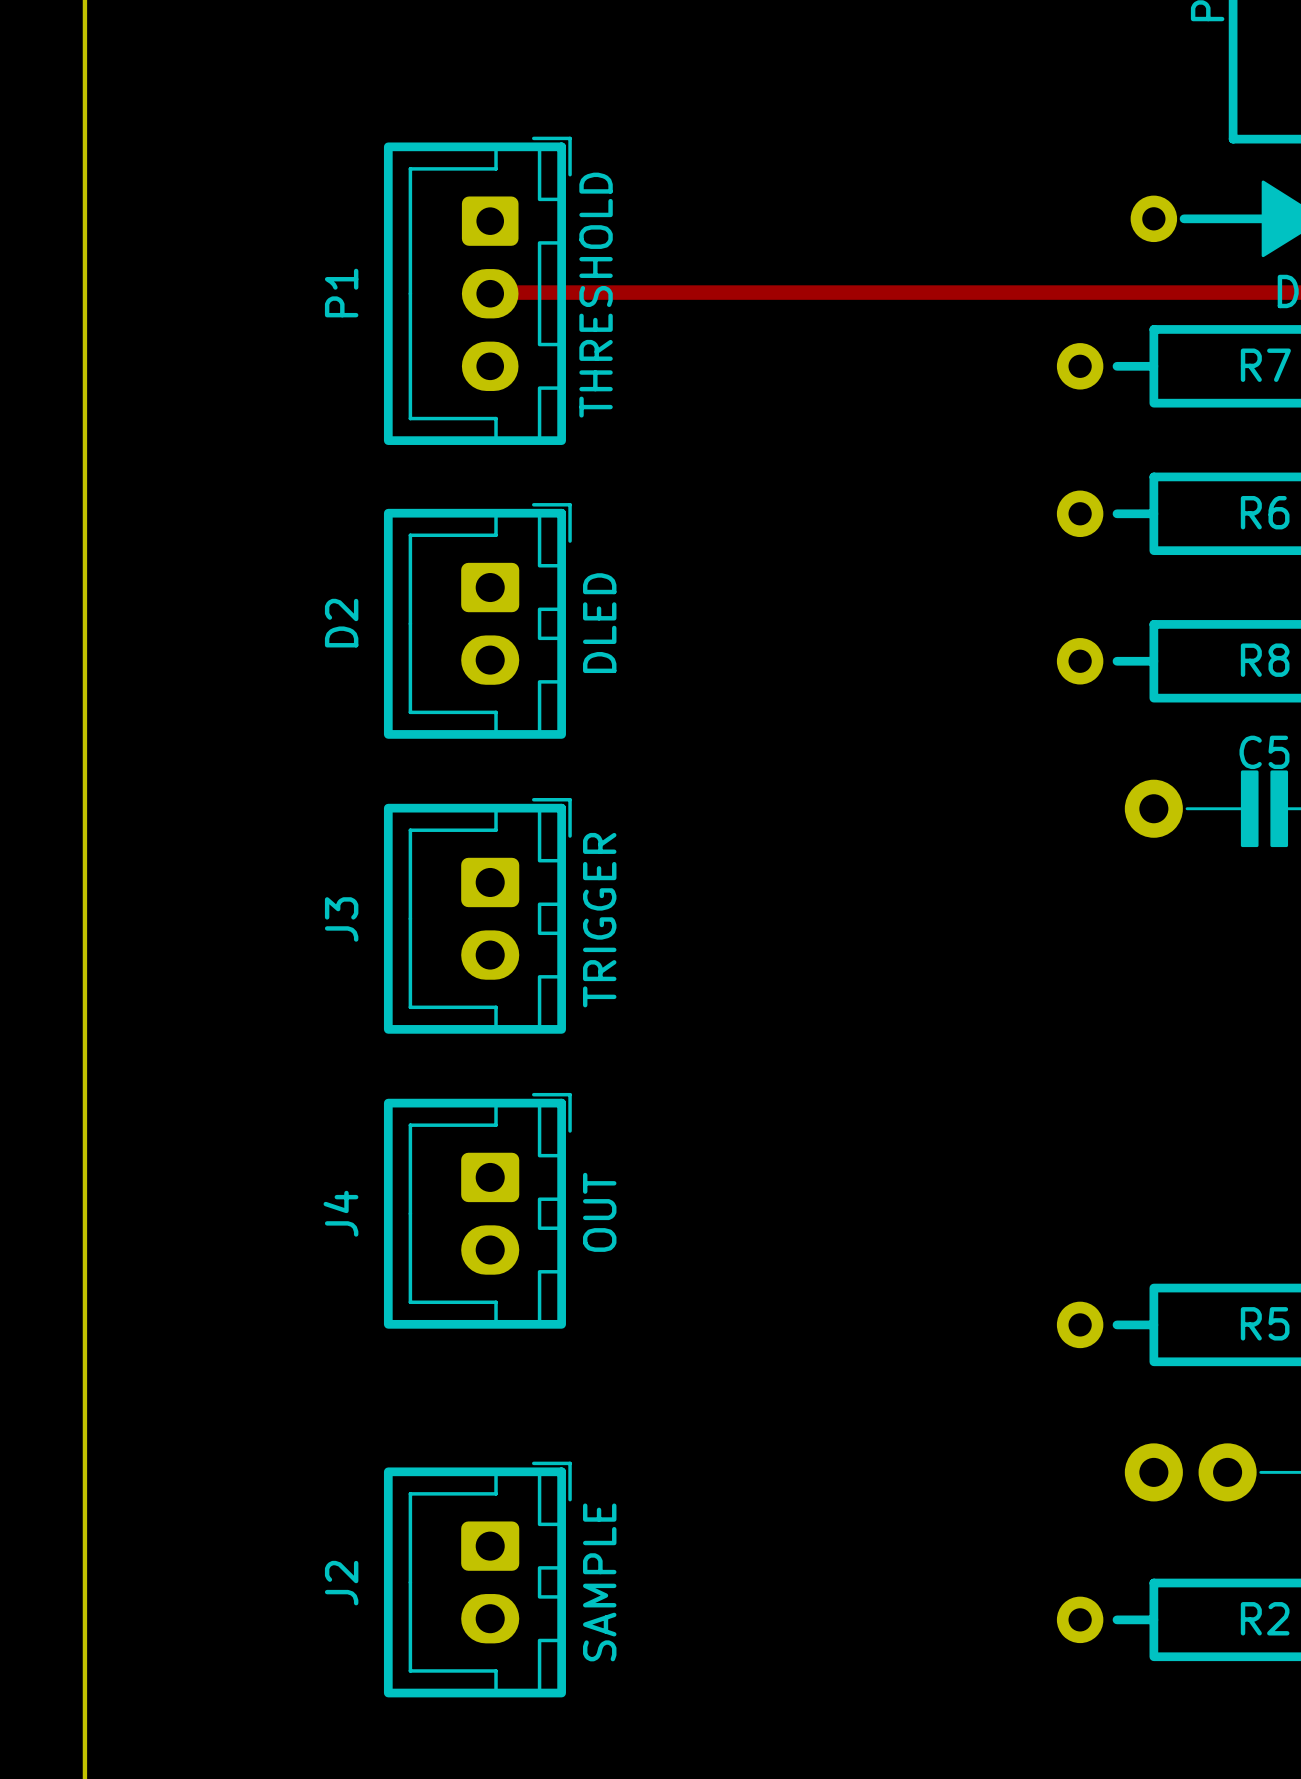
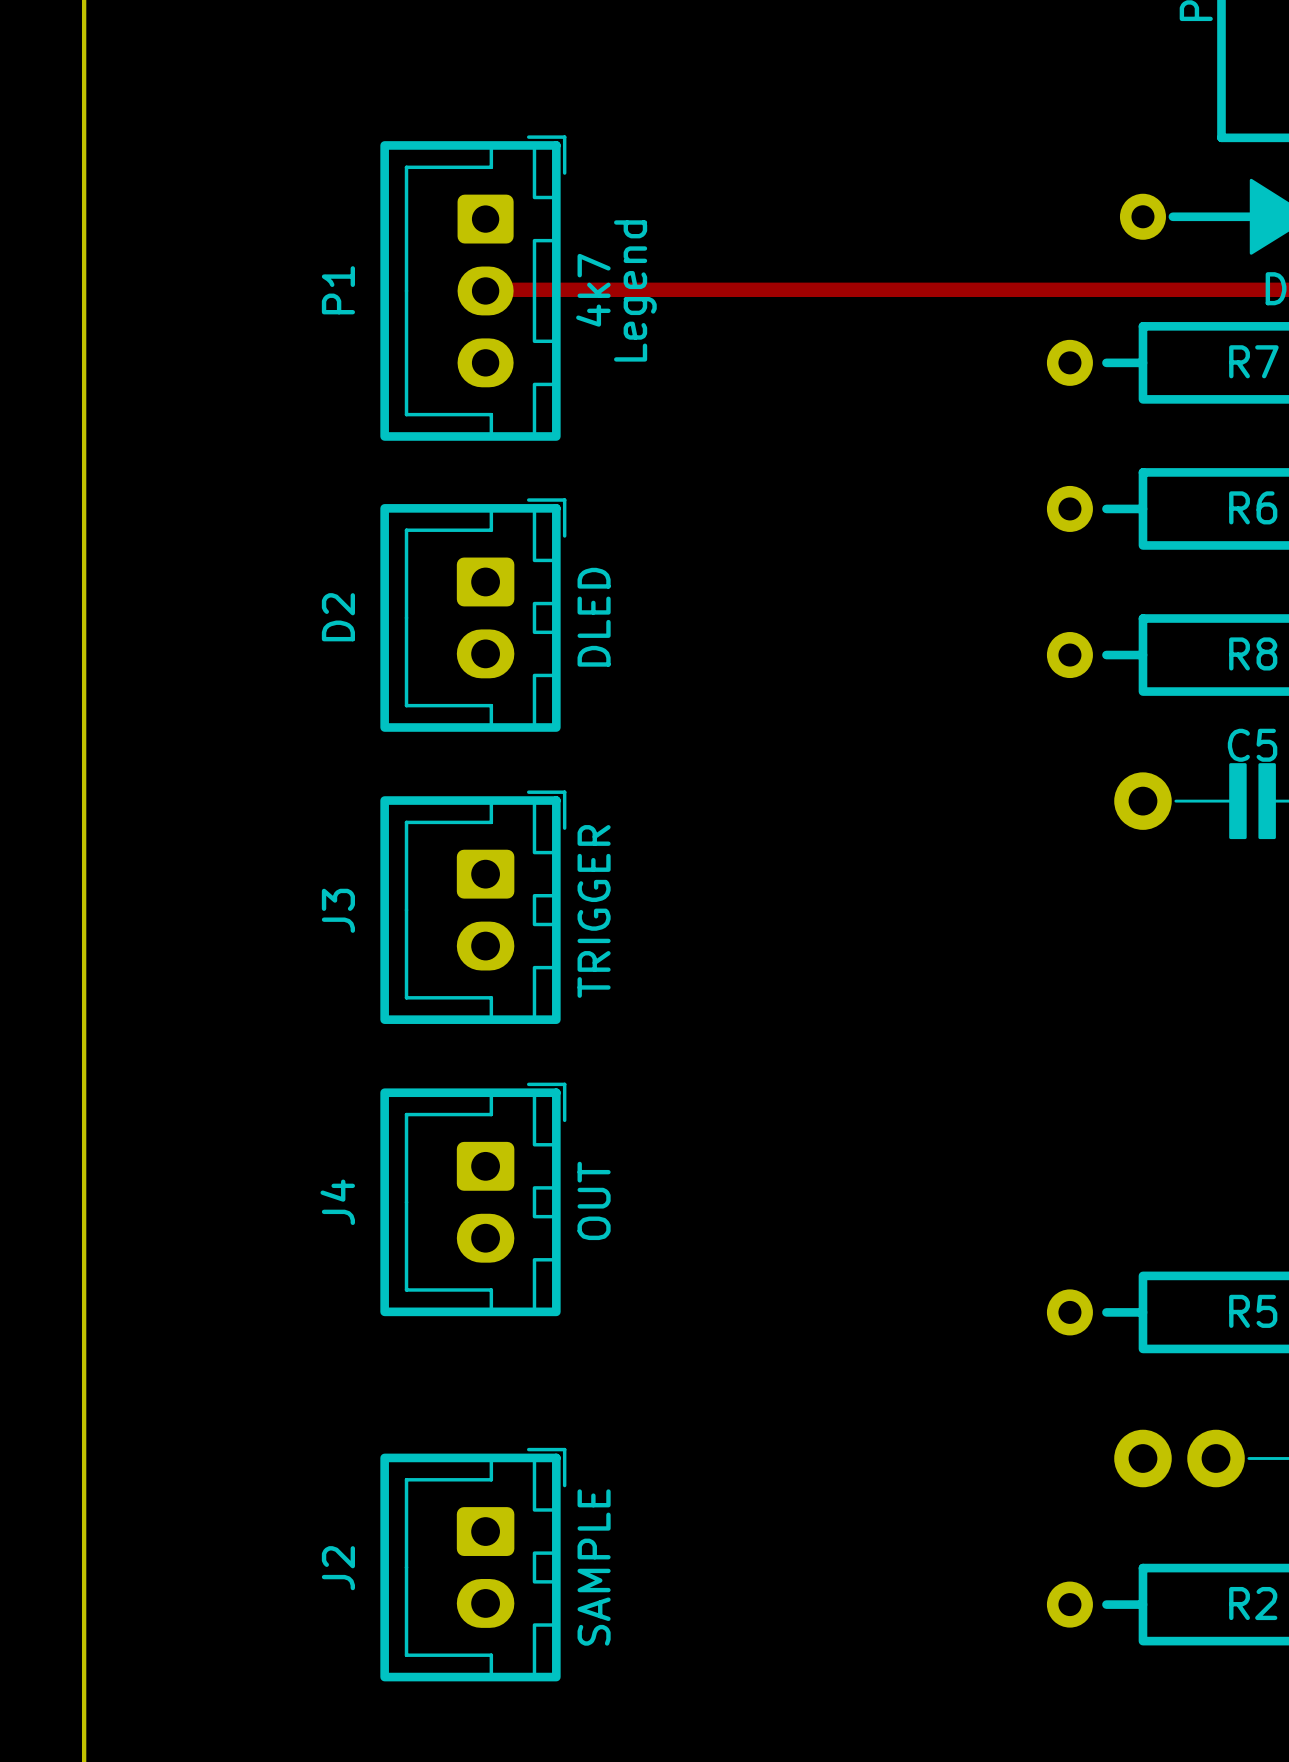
P1 value: none -> 4k7 (593, 290)
P1 text: THRESHOLD (596, 295) -> Legend (635, 290)

